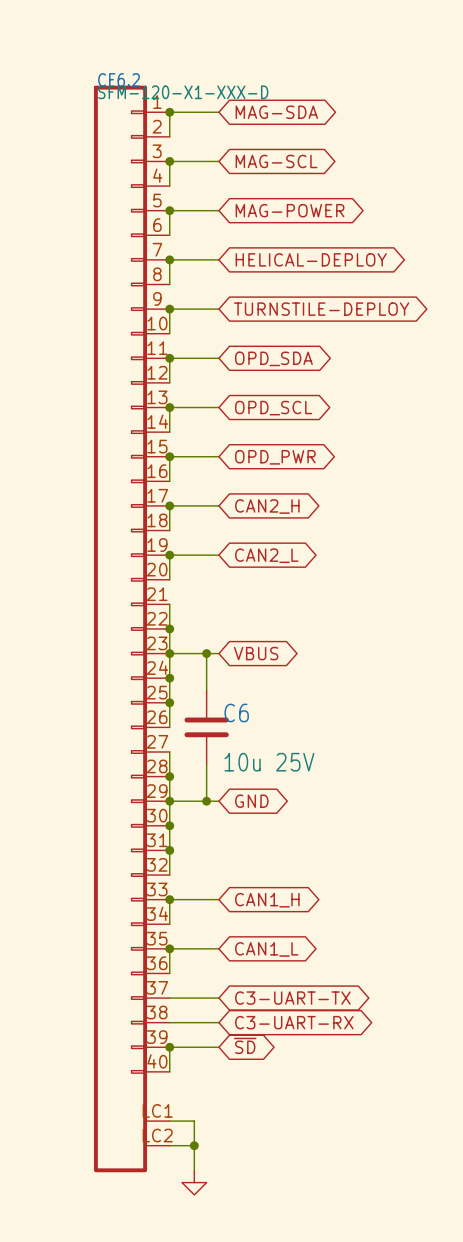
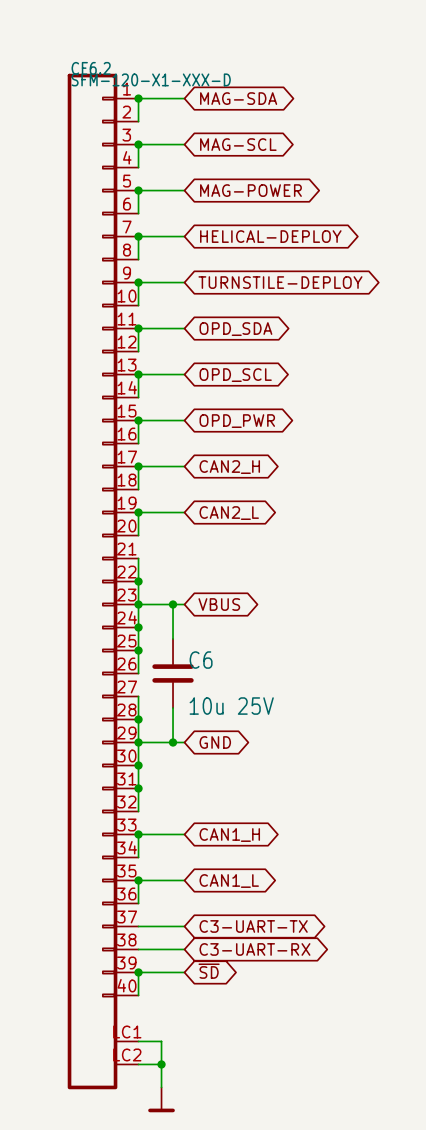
power symbol shape: [182, 1170, 207, 1195] -> [148, 1087, 175, 1113]

